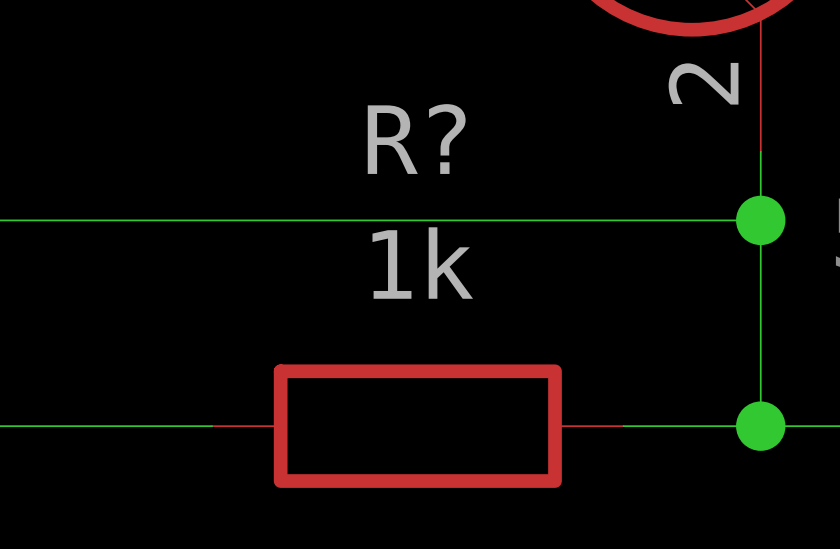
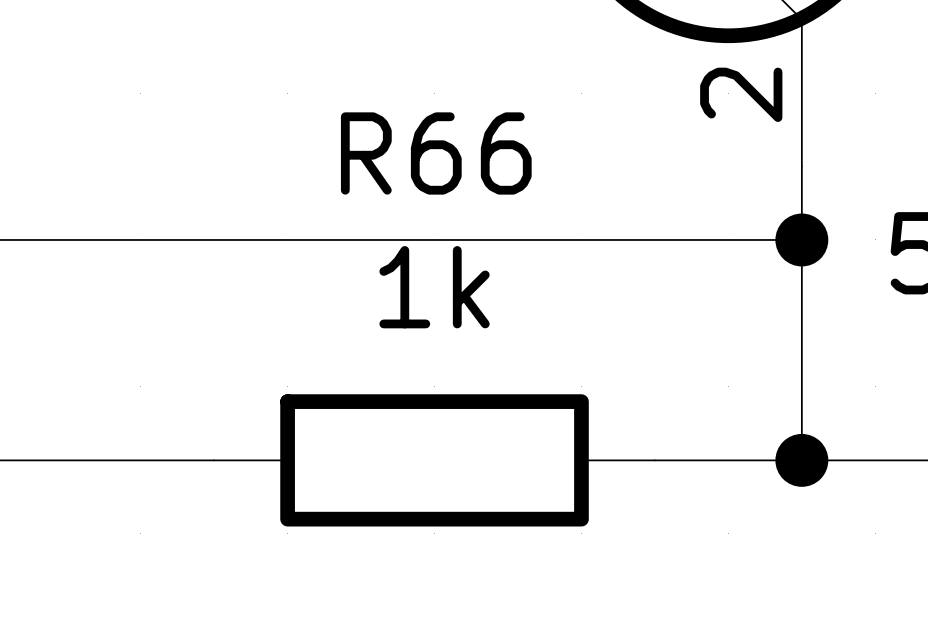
R? name: R? (416, 139) -> R66 (436, 153)

